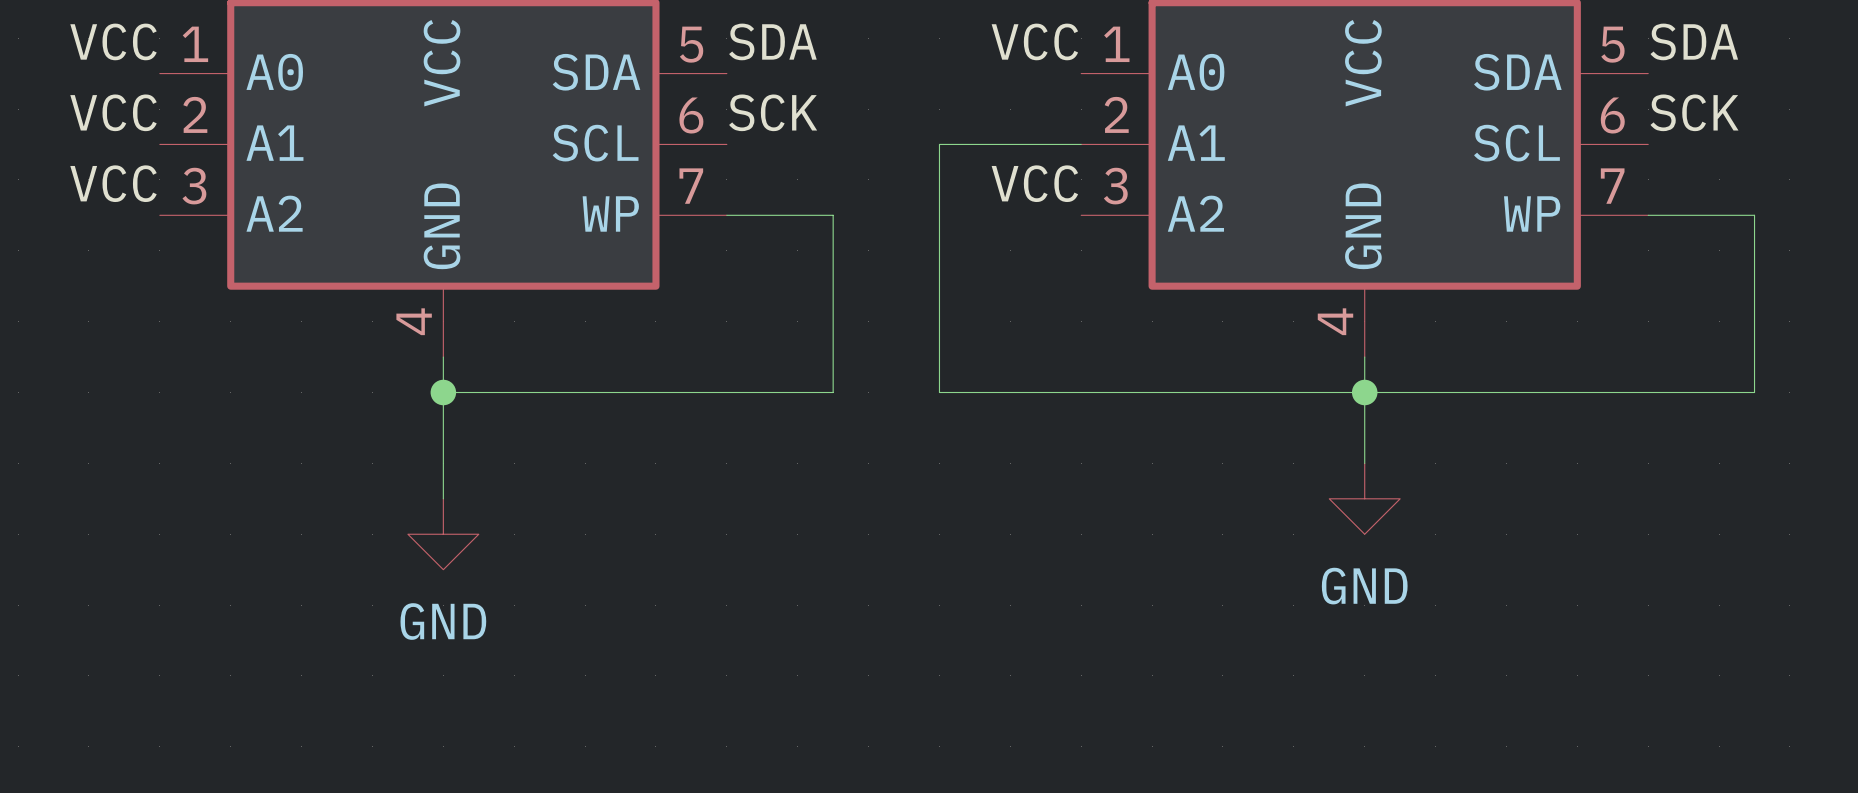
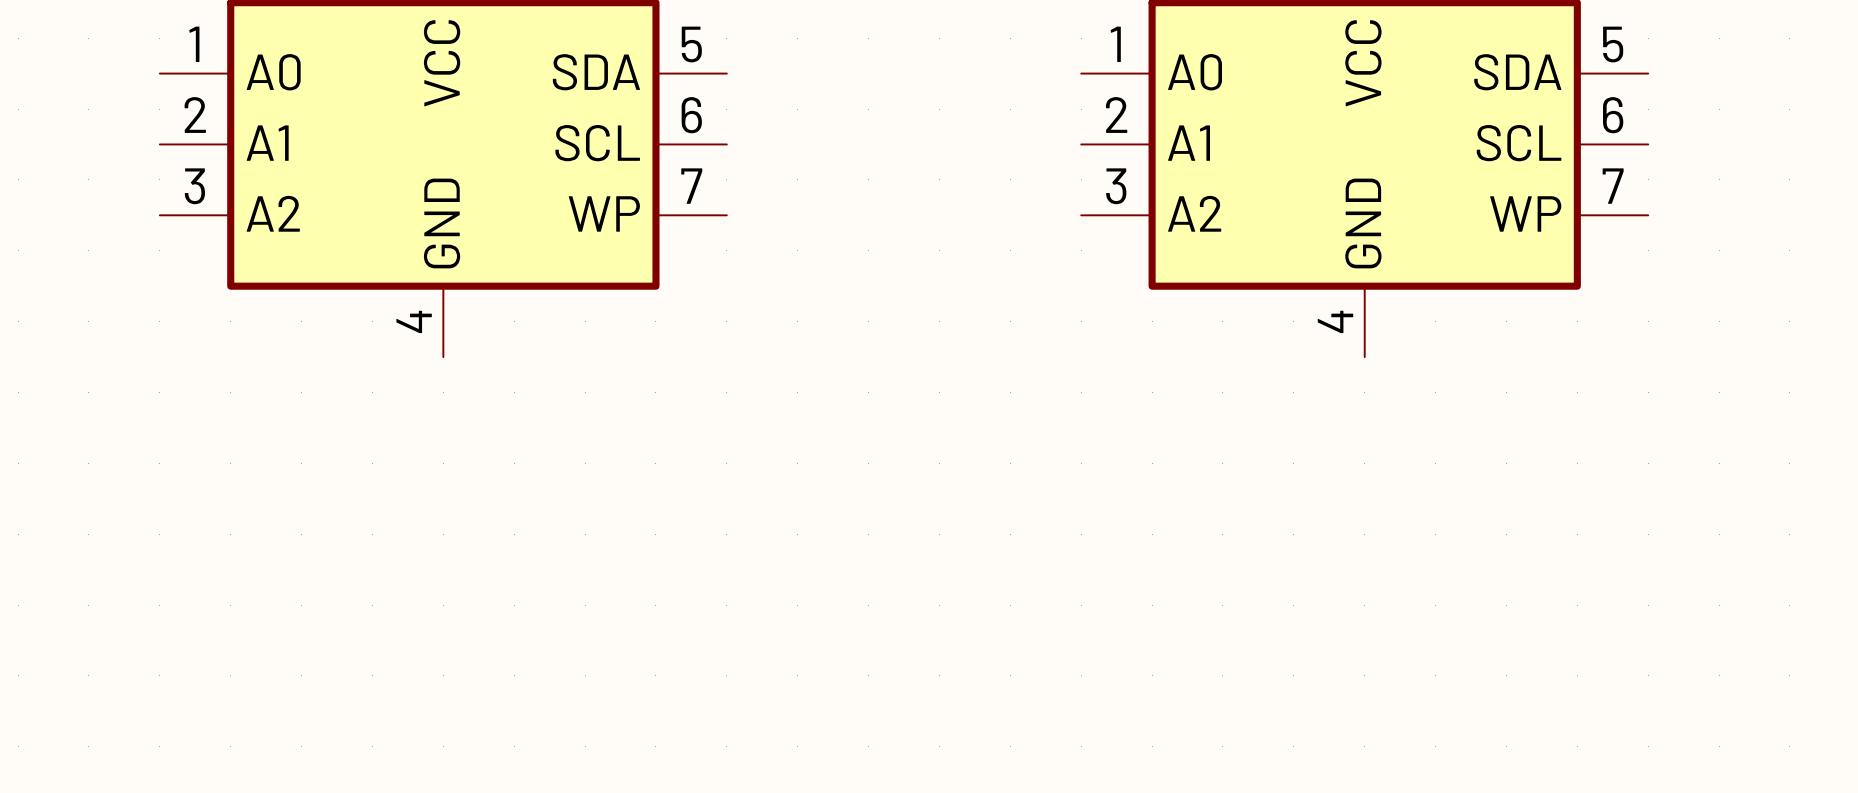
label: VCC (113, 41) -> none
label: SDA (772, 41) -> none
label: VCC (1034, 41) -> none
label: SDA (1694, 41) -> none
label: VCC (113, 112) -> none
label: SCK (773, 112) -> none
label: SCK (1694, 112) -> none
wire: (1081, 144) (939, 144) (939, 392) (1754, 392) (1754, 215) (1648, 215) -> none
label: VCC (113, 183) -> none
label: VCC (1034, 183) -> none
wire: (726, 215) (833, 215) (833, 392) (443, 392) -> none
wire: (443, 357) (443, 498) -> none
wire: (1364, 357) (1364, 463) -> none
junction: (443, 392) -> none
junction: (1364, 392) -> none
power symbol: GND (1364, 498) -> none
power symbol: GND (443, 534) -> none

